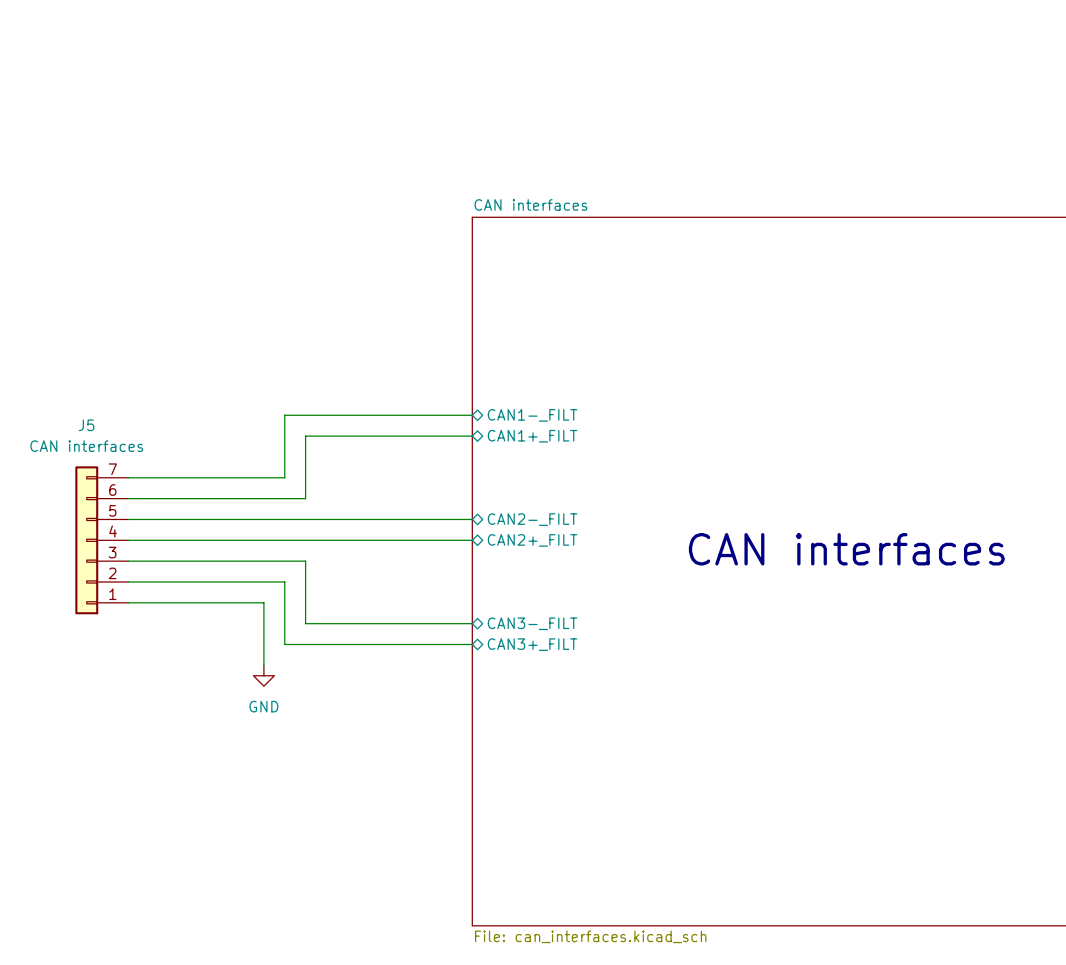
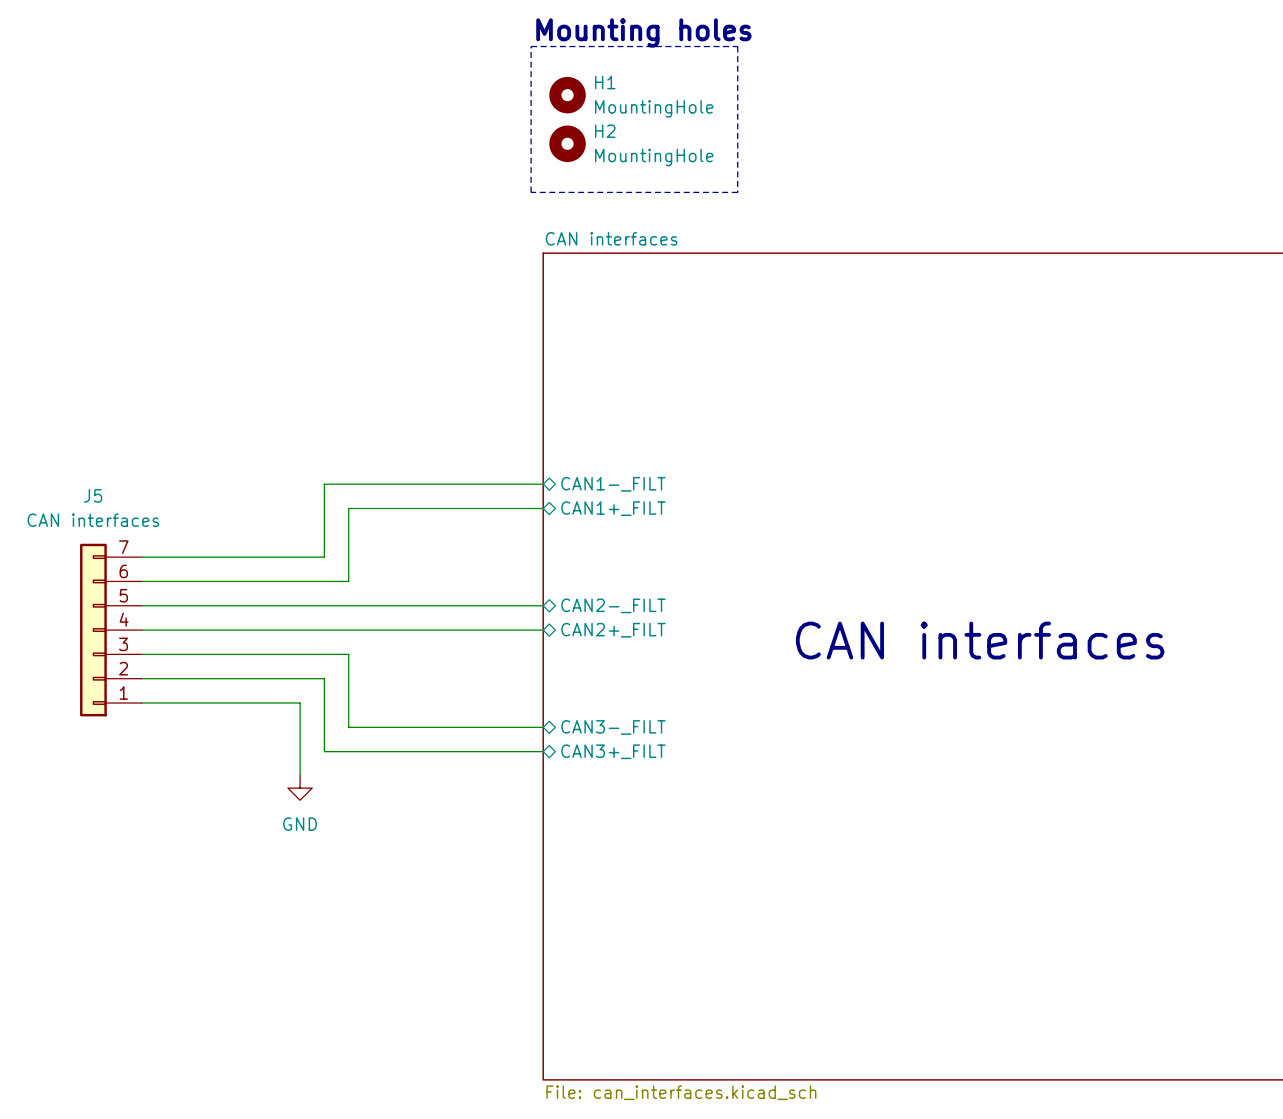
text: none -> Mounting holes (643, 32)
line: none -> (531, 46) (737, 46) (737, 192) (531, 192) (531, 46)
H1: none -> MountingHole (567, 95)
H2: none -> MountingHole (567, 143)

